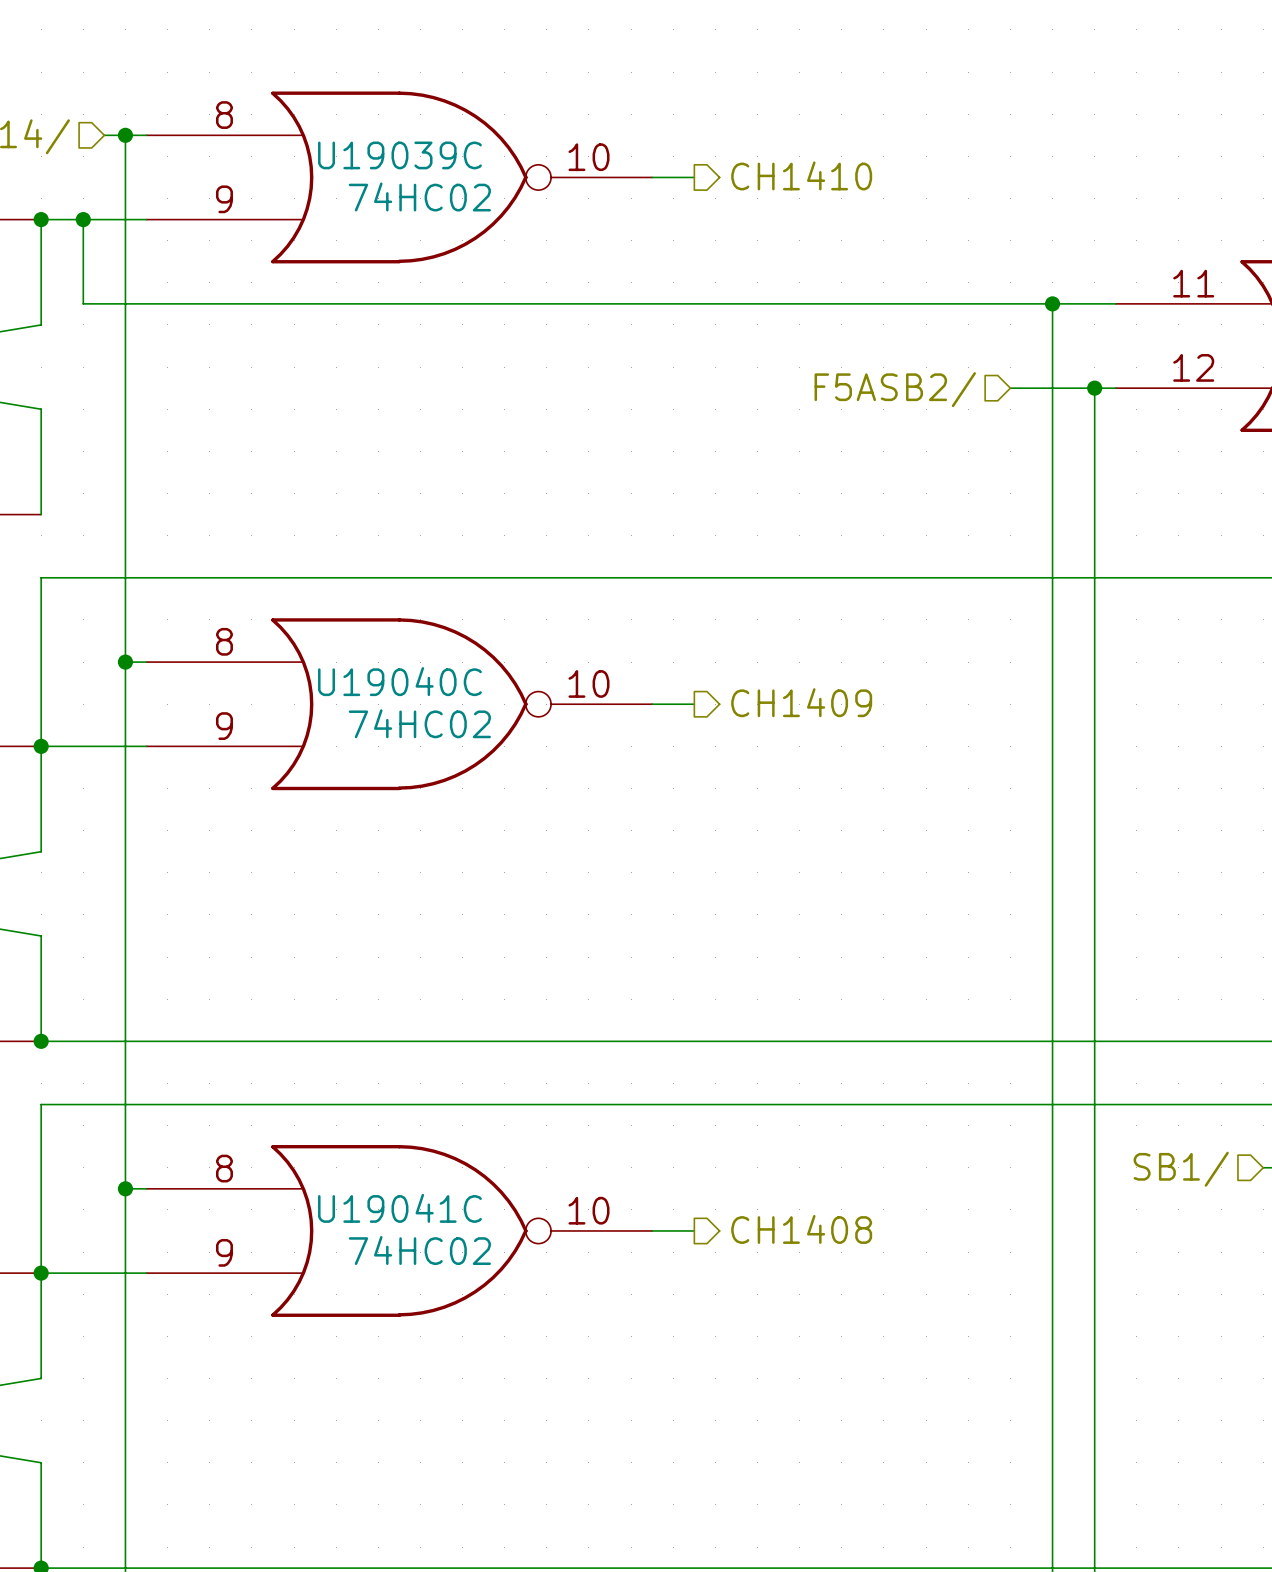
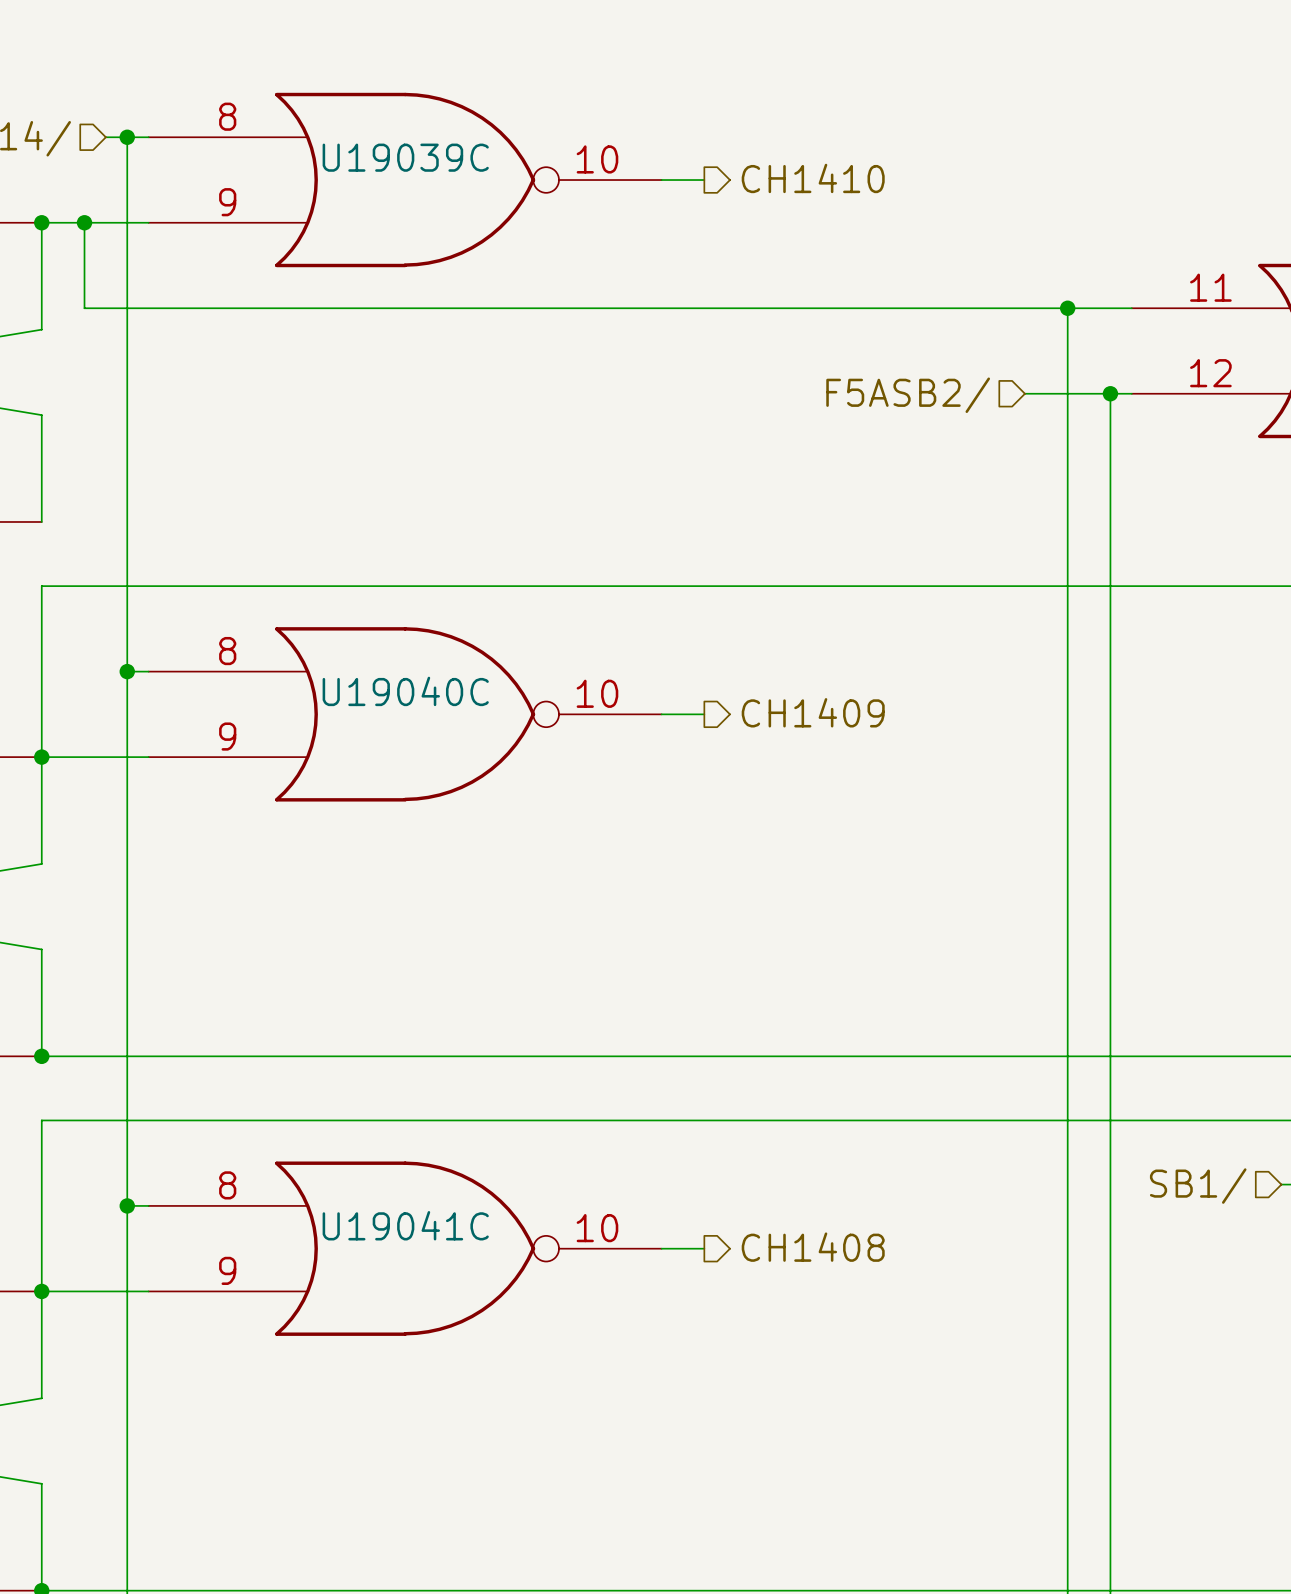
U19039C value: 74HC02 (419, 196) -> none
U19040C value: 74HC02 (419, 723) -> none
U19041C value: 74HC02 (419, 1250) -> none

